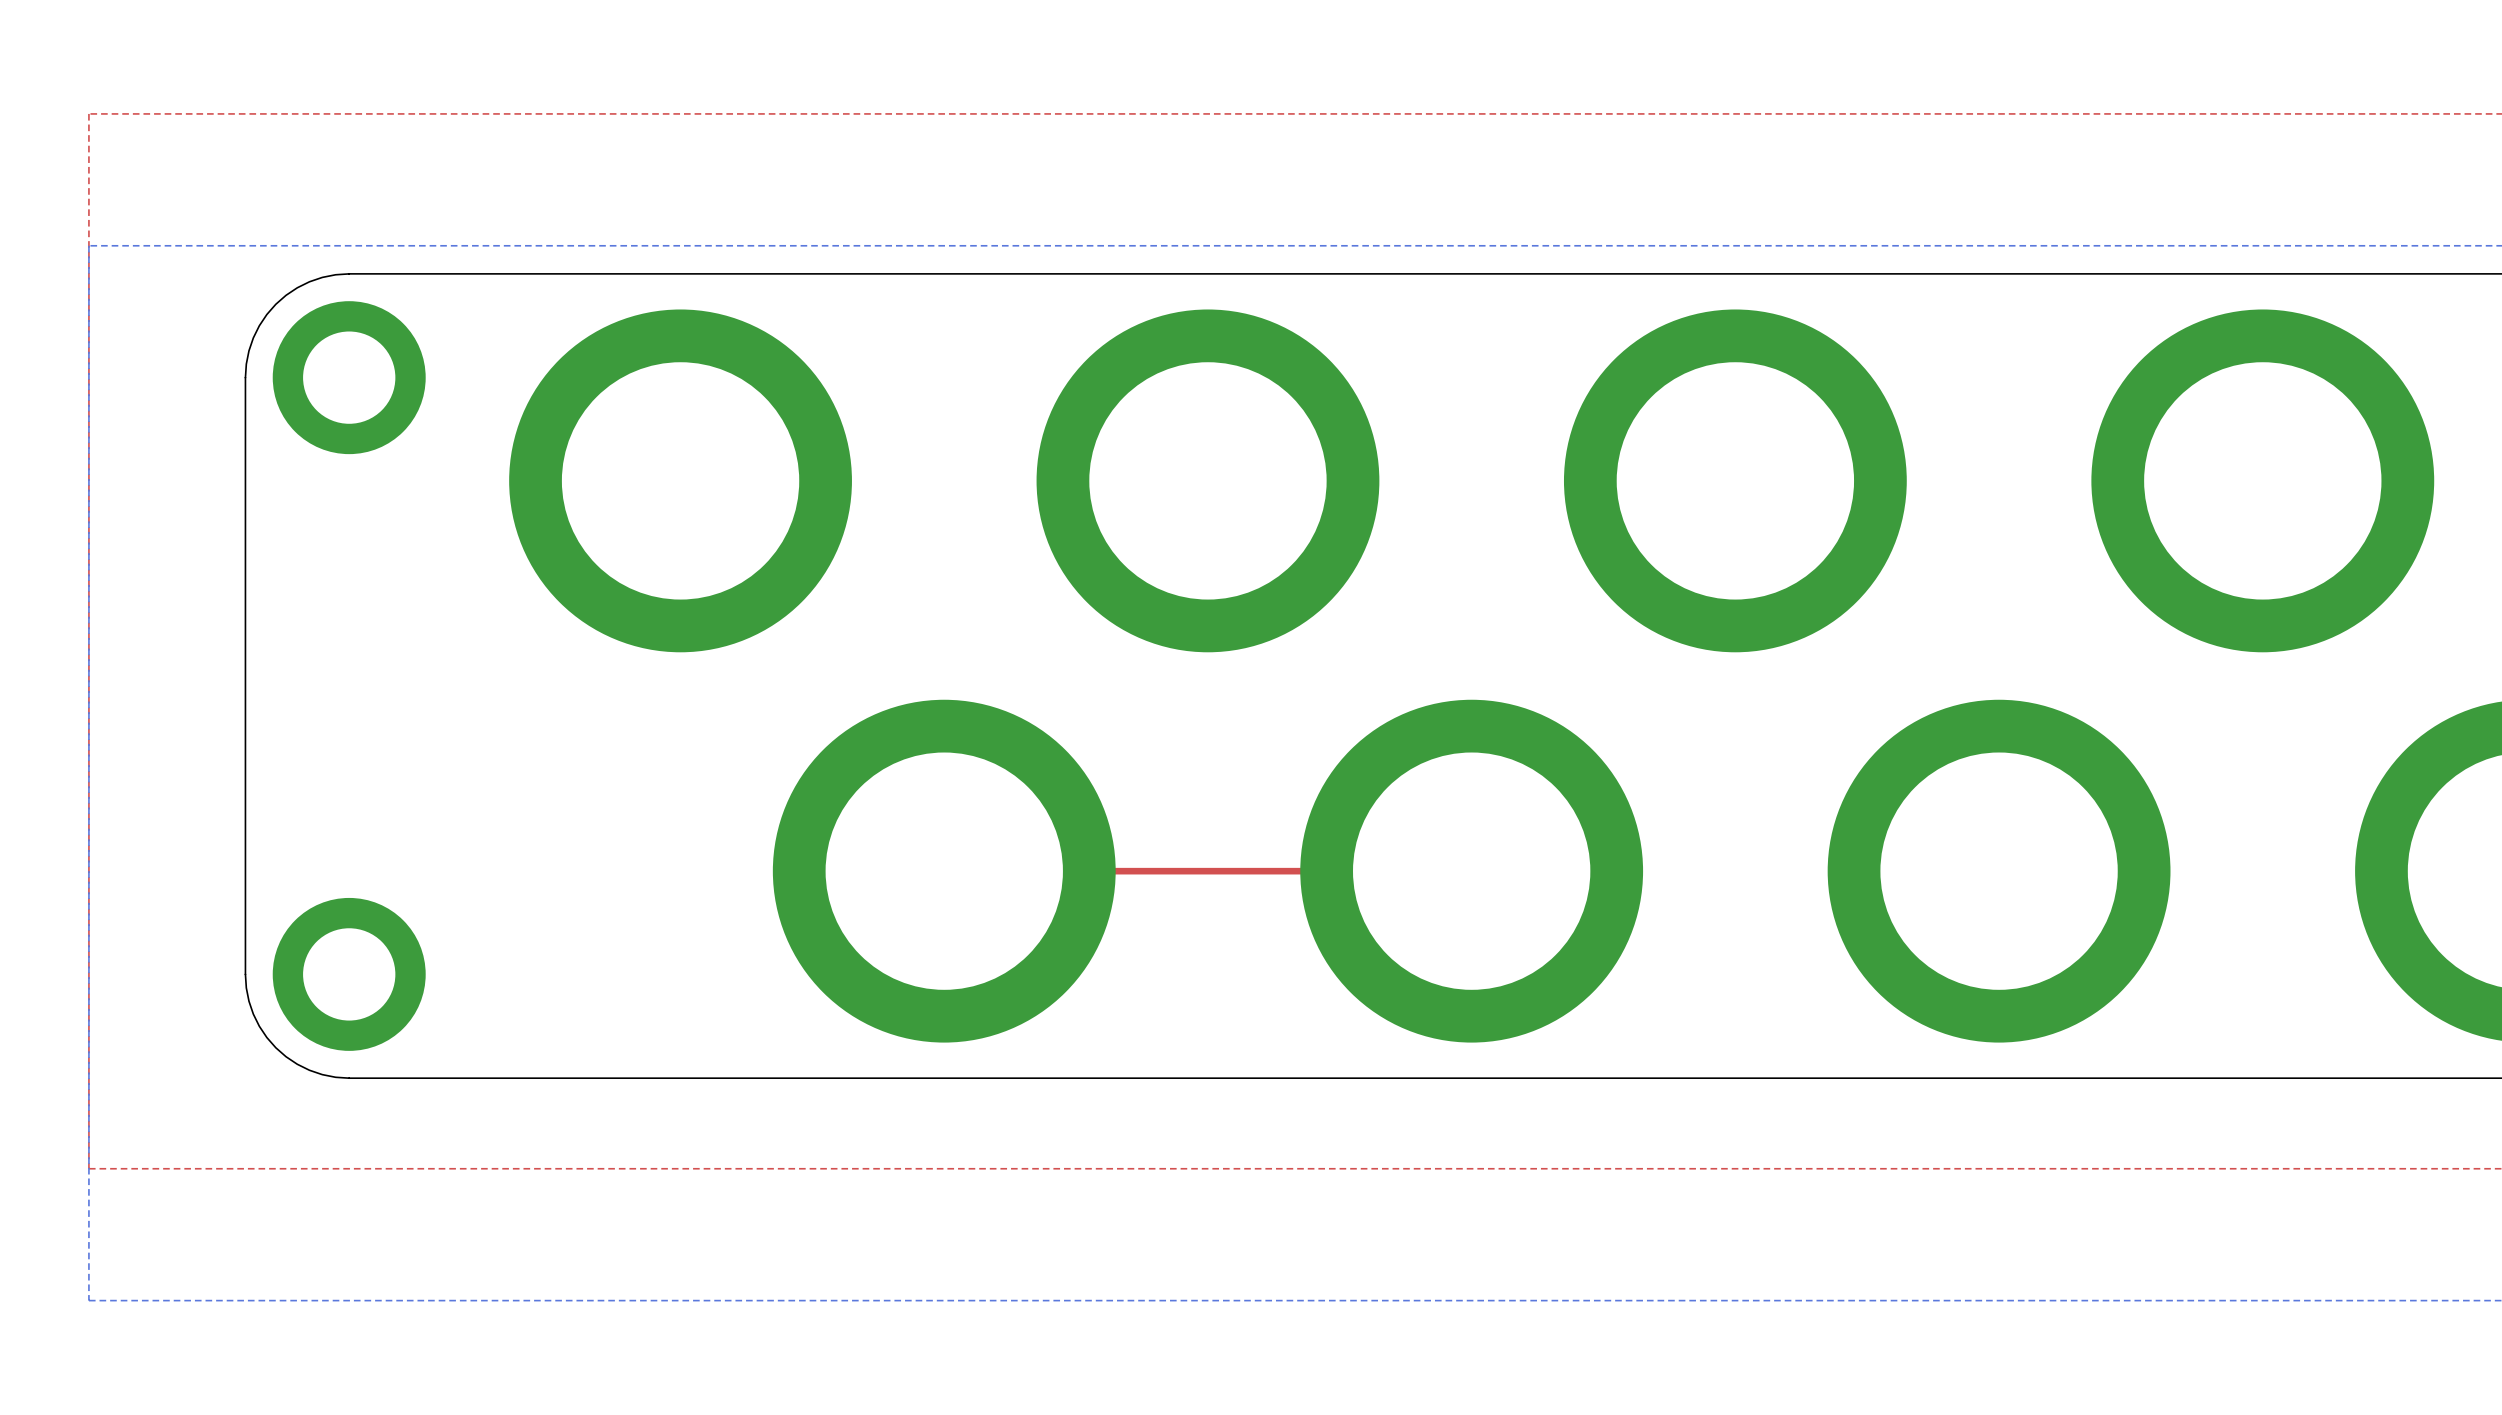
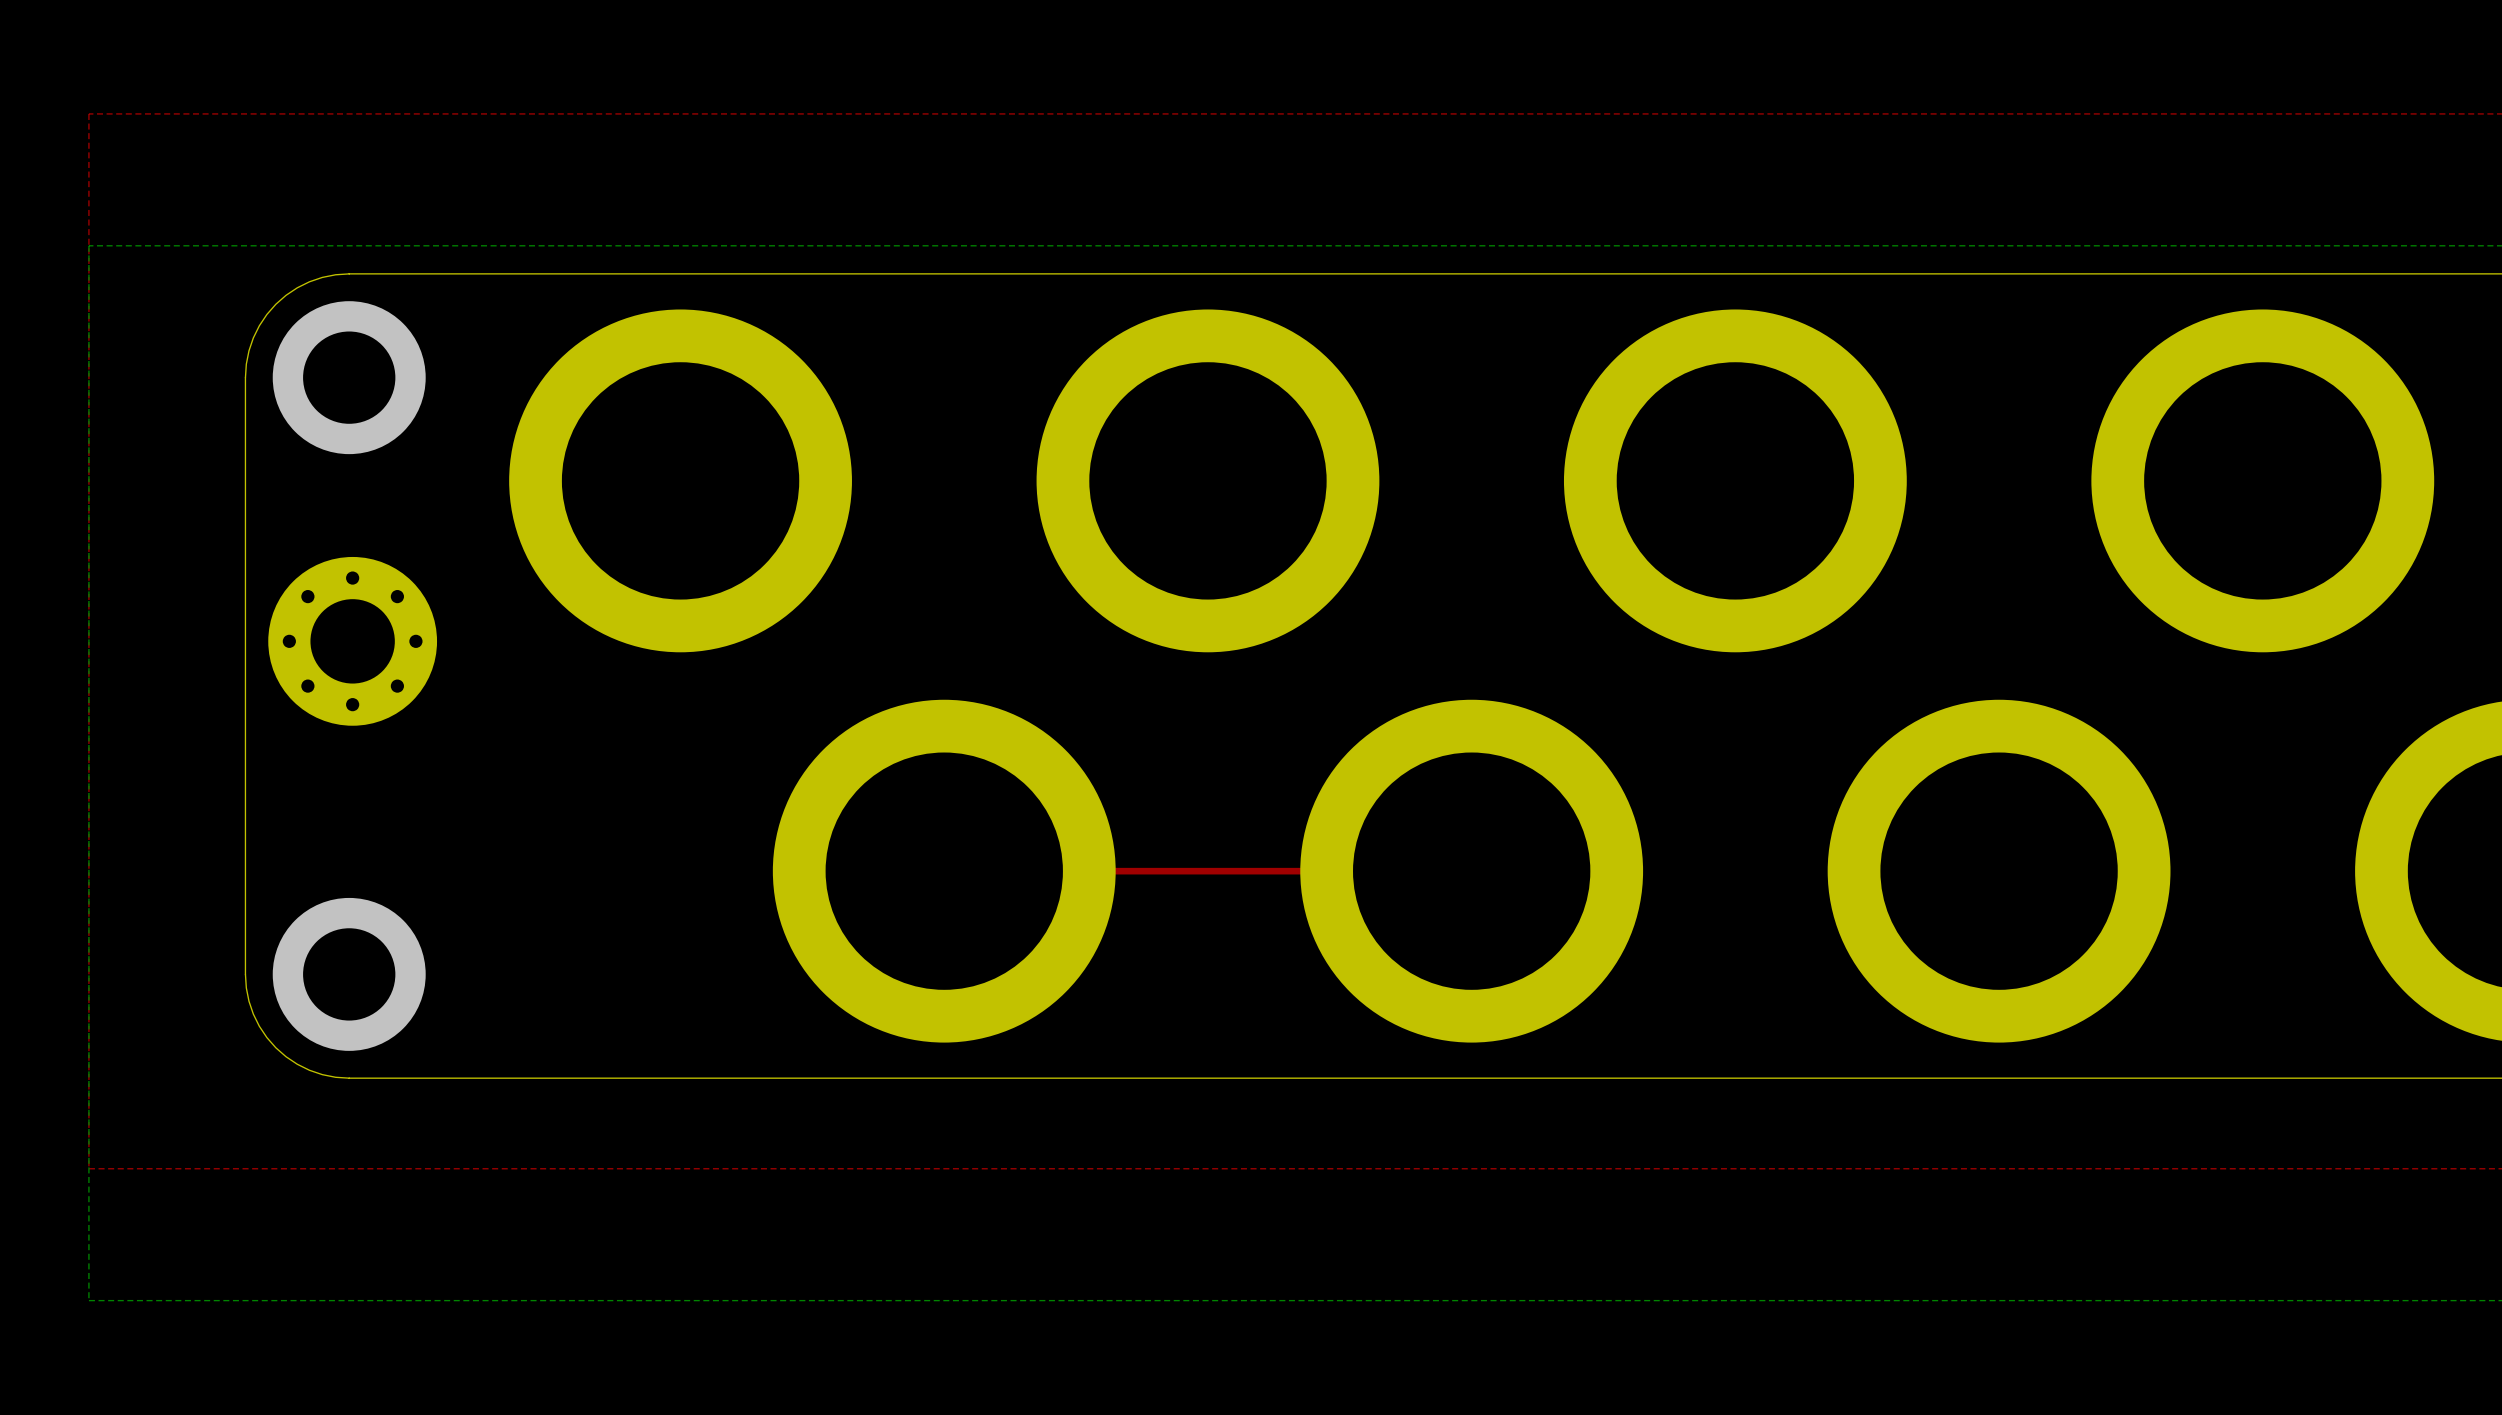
part: none -> (352, 641)

